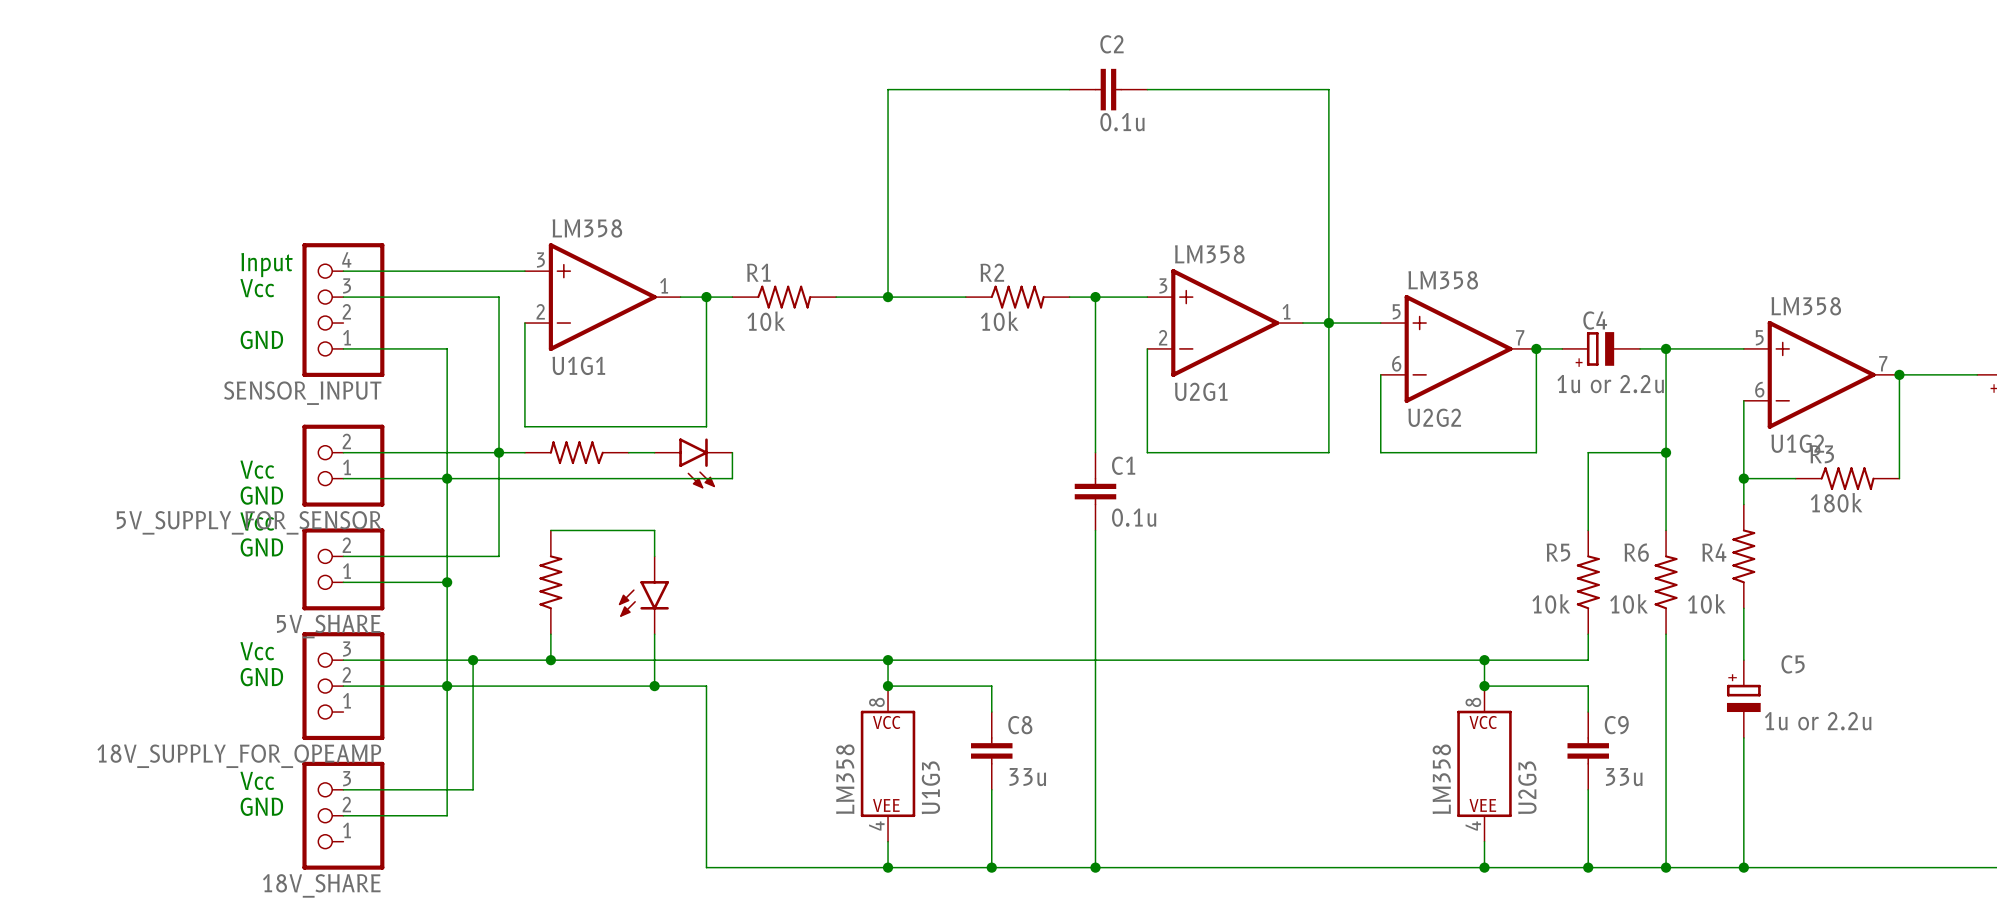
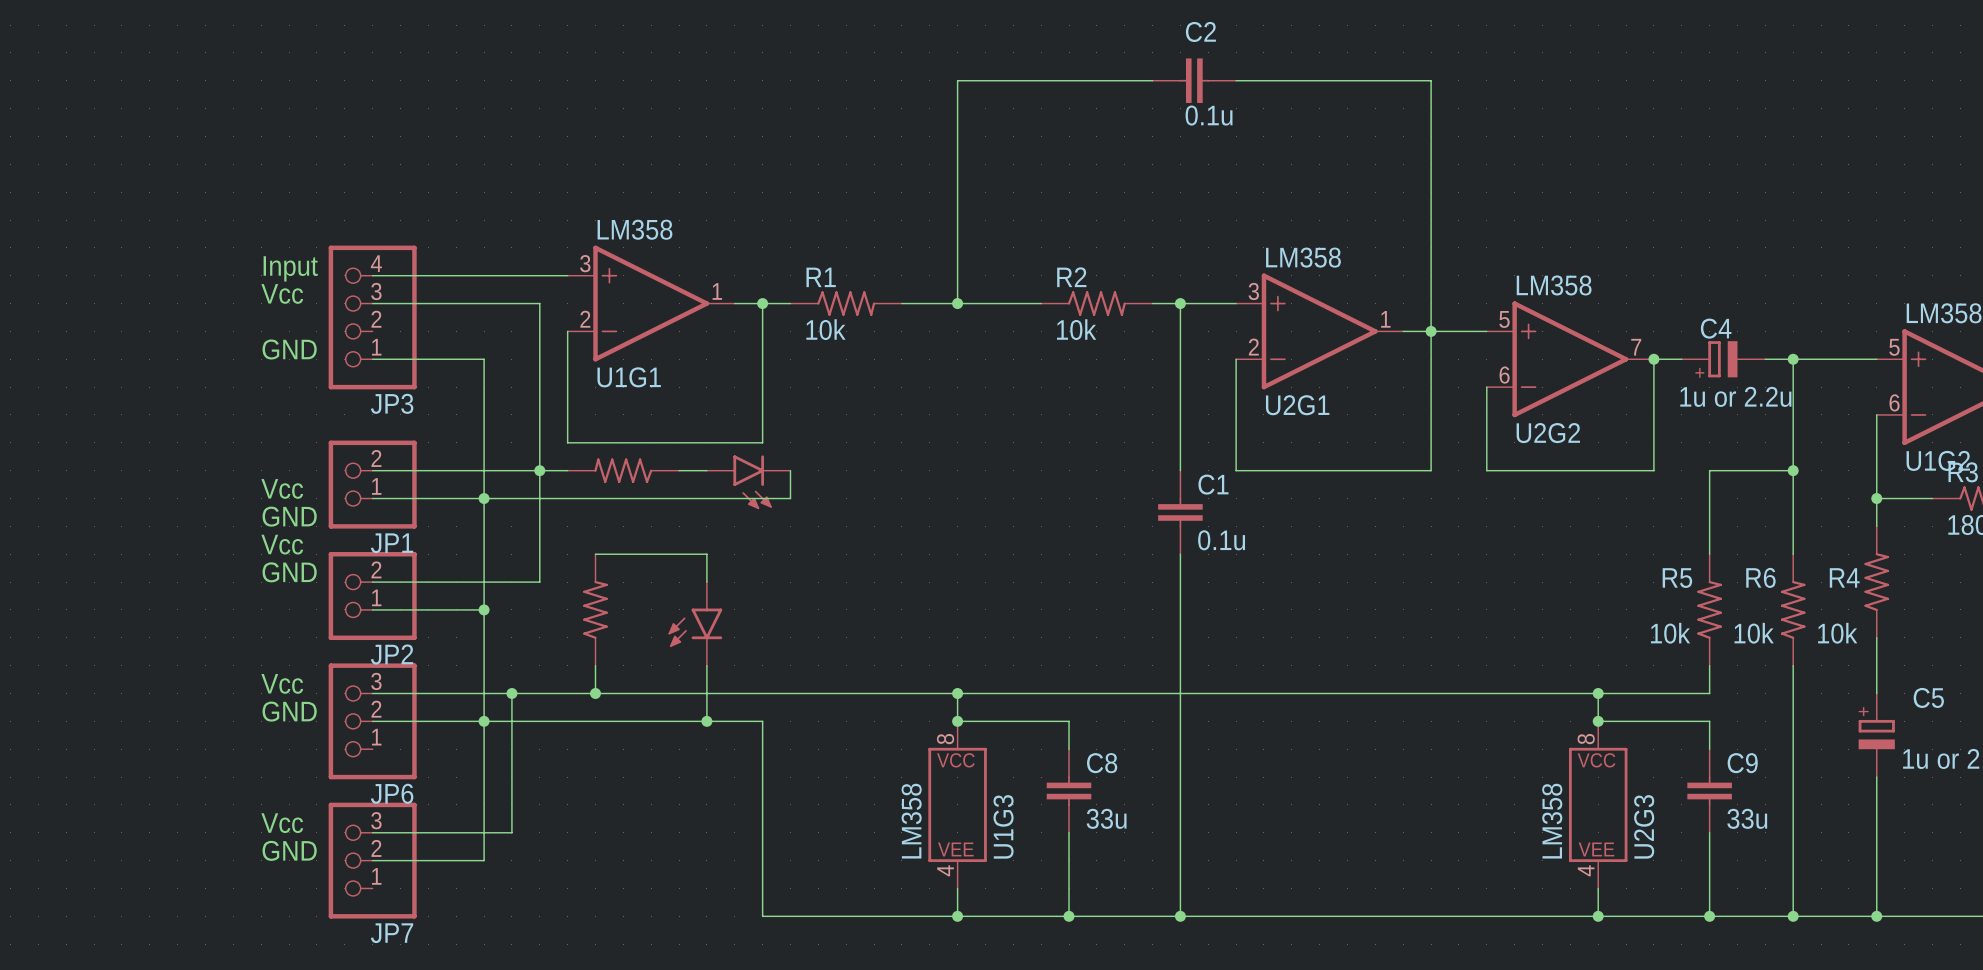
SENSOR_INPUT name: SENSOR_INPUT (302, 393) -> JP3 (392, 403)
5V_SUPPLY_FOR_SENSOR name: 5V_SUPPLY_FOR_SENSOR (249, 522) -> JP1 (392, 543)
5V_SHARE name: 5V_SHARE (328, 626) -> JP2 (392, 654)
18V_SUPPLY_FOR_OPEAMP name: 18V_SUPPLY_FOR_OPEAMP (239, 756) -> JP6 (392, 793)
18V_SHARE name: 18V_SHARE (321, 885) -> JP7 (392, 933)

